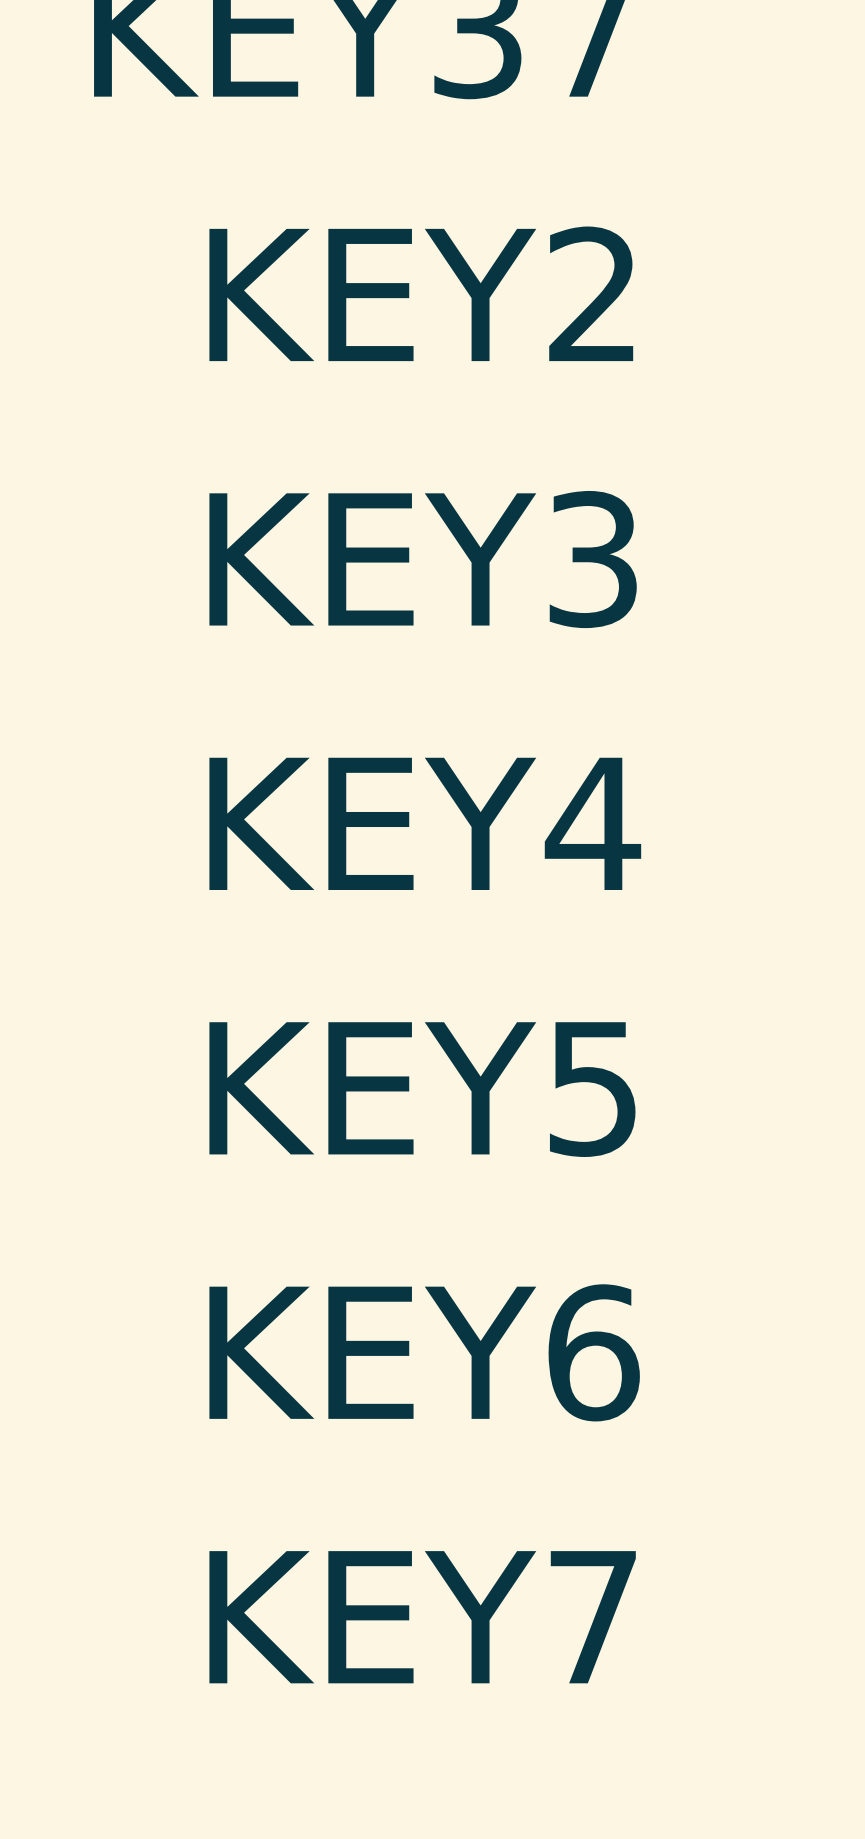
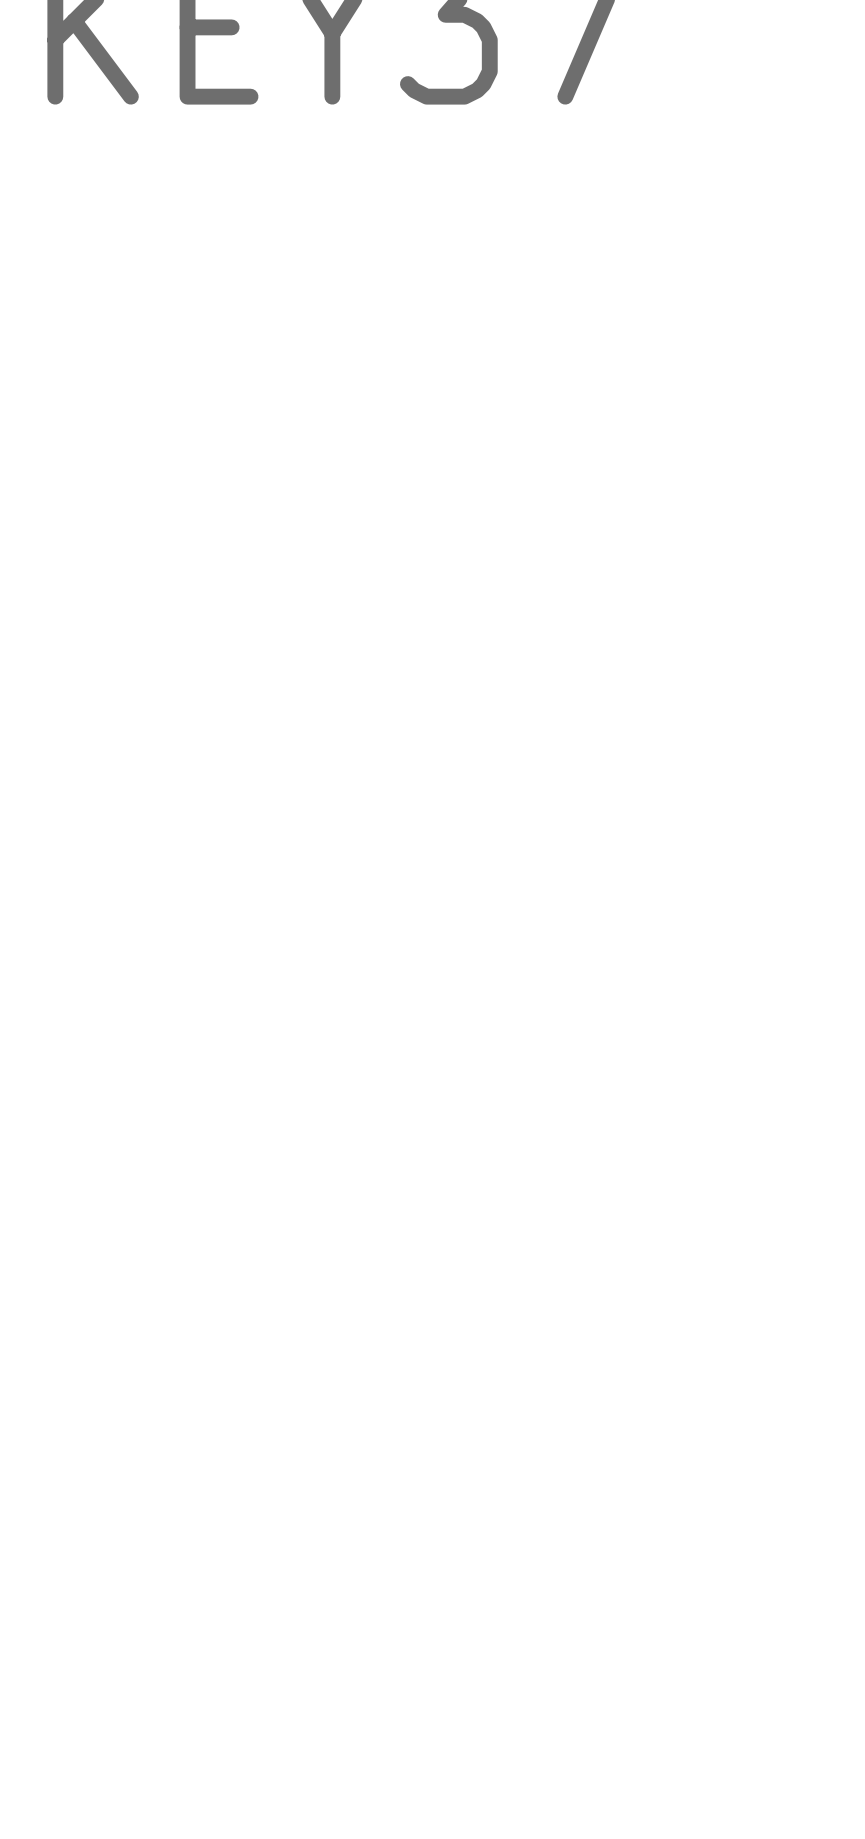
label: KEY2 (421, 293) -> none
label: KEY3 (423, 559) -> none
label: KEY4 (425, 823) -> none
label: KEY5 (422, 1089) -> none
label: KEY6 (424, 1352) -> none
label: KEY7 (422, 1617) -> none

